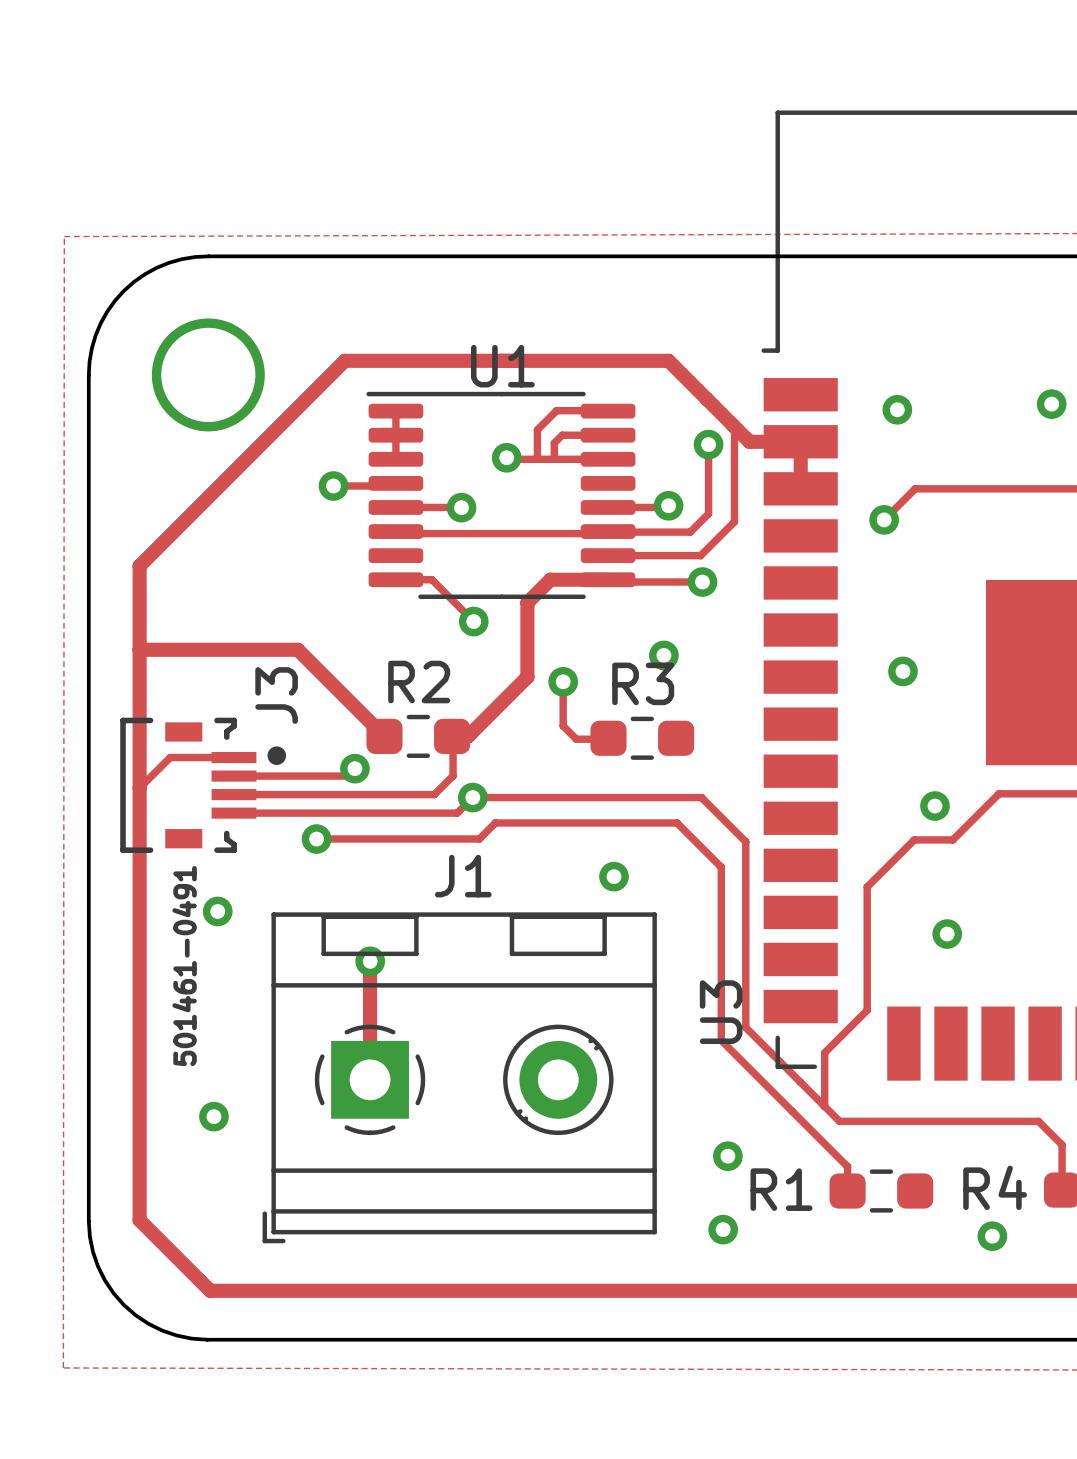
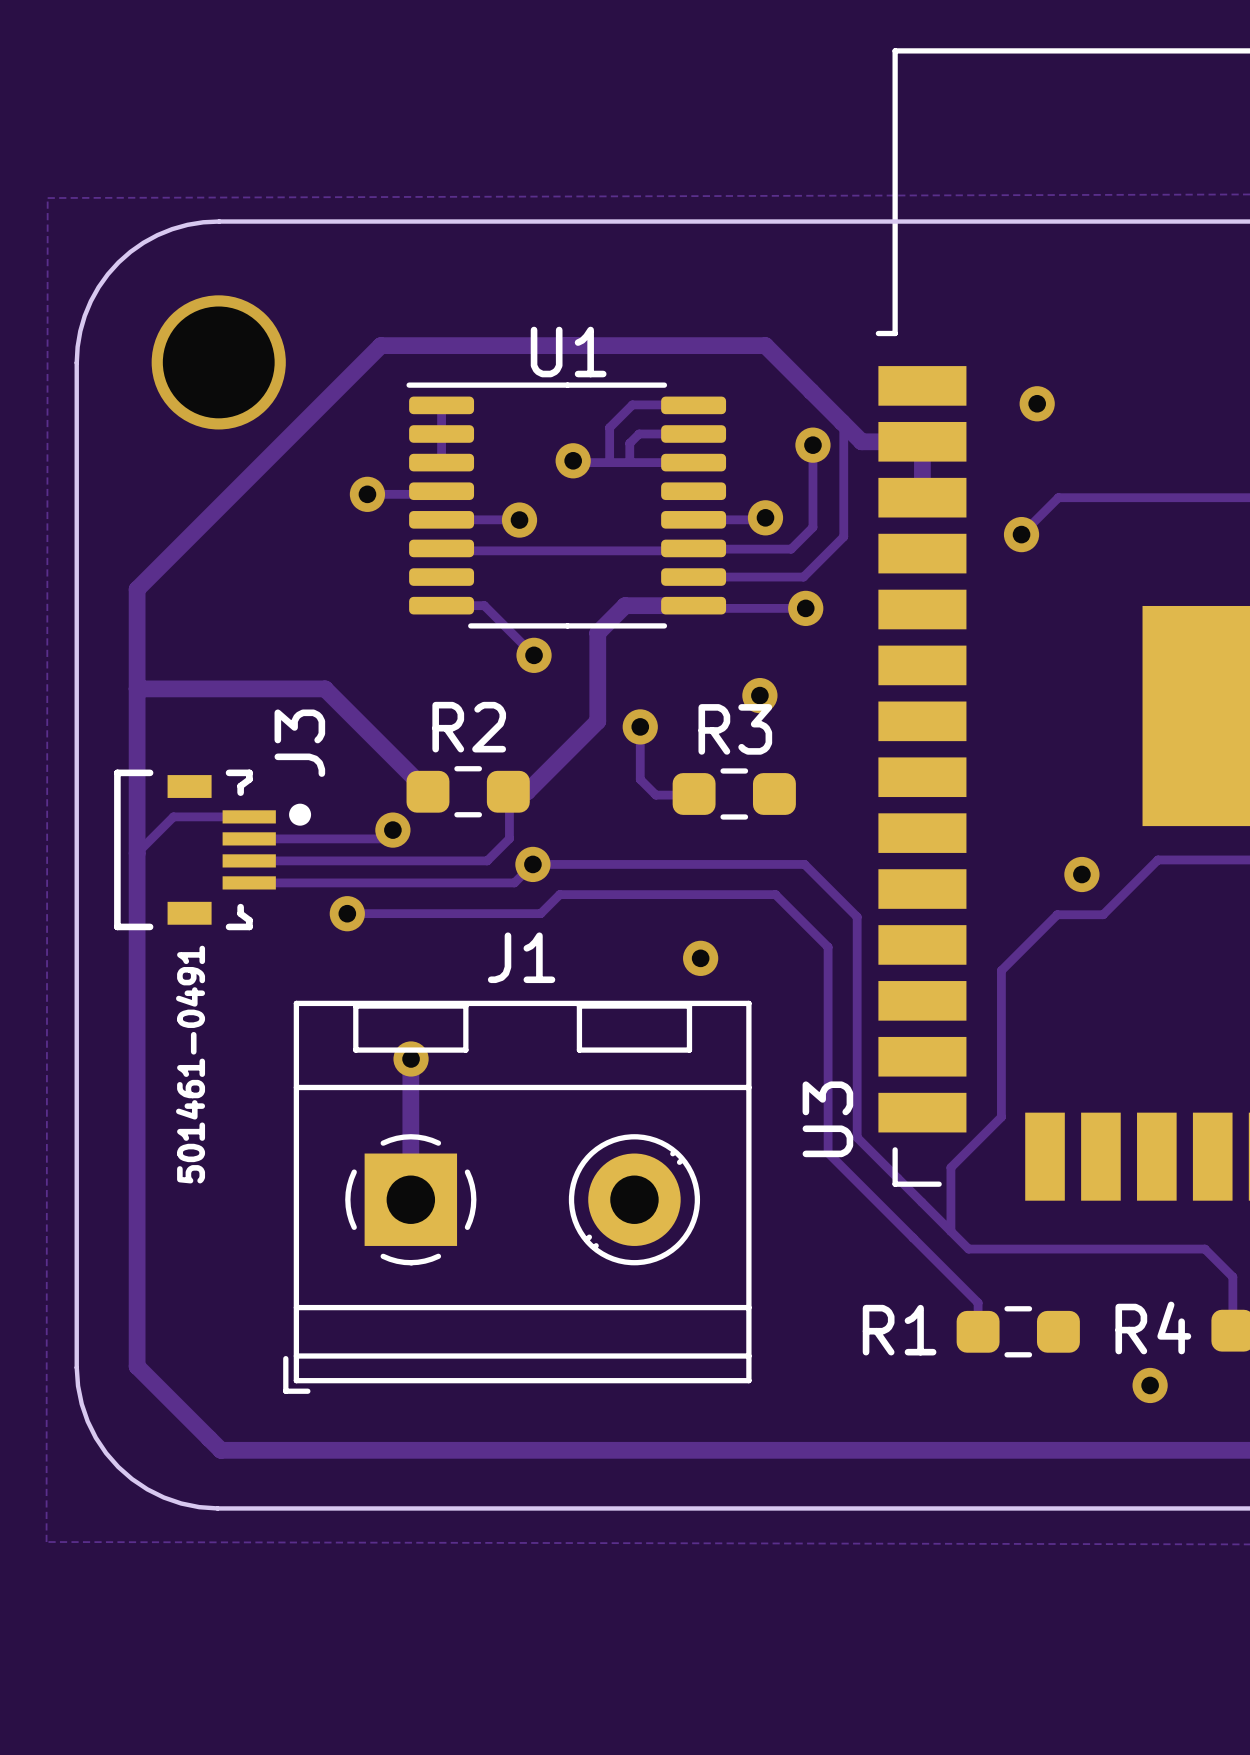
via: (1051, 404) -> none
via: (902, 671) -> none
via: (217, 911) -> none
via: (947, 934) -> none
via: (213, 1116) -> none
via: (727, 1156) -> none
via: (723, 1229) -> none

